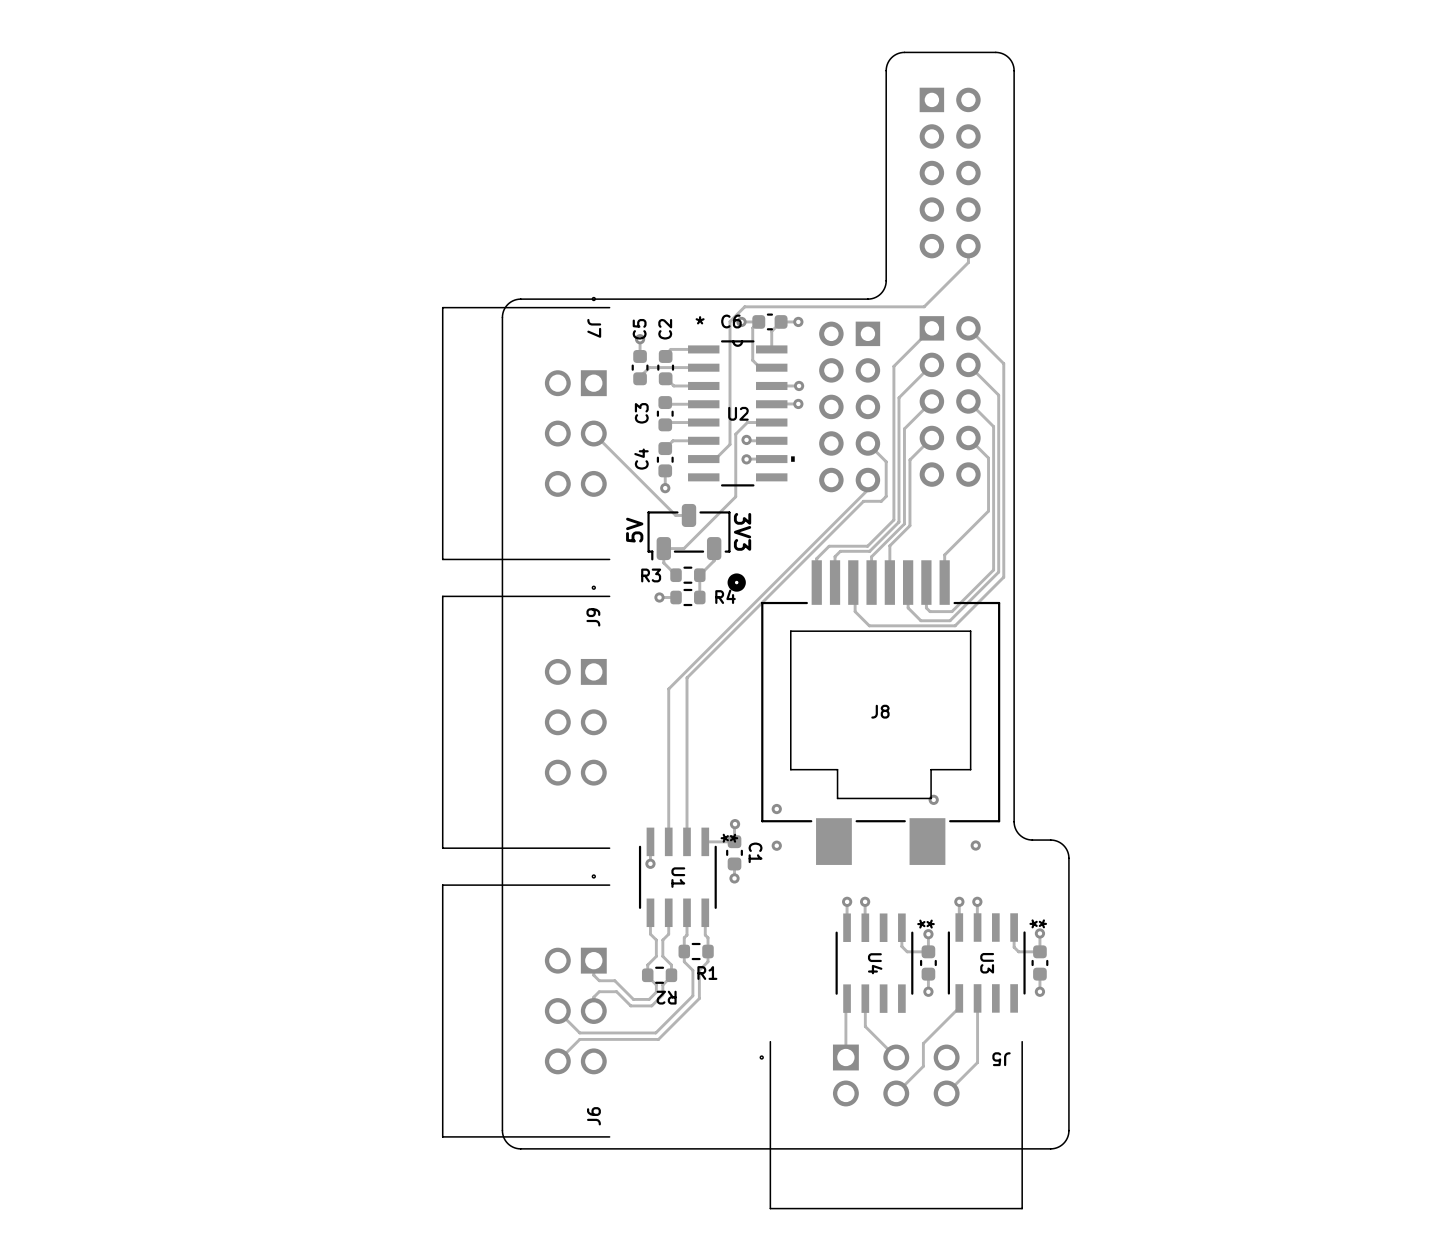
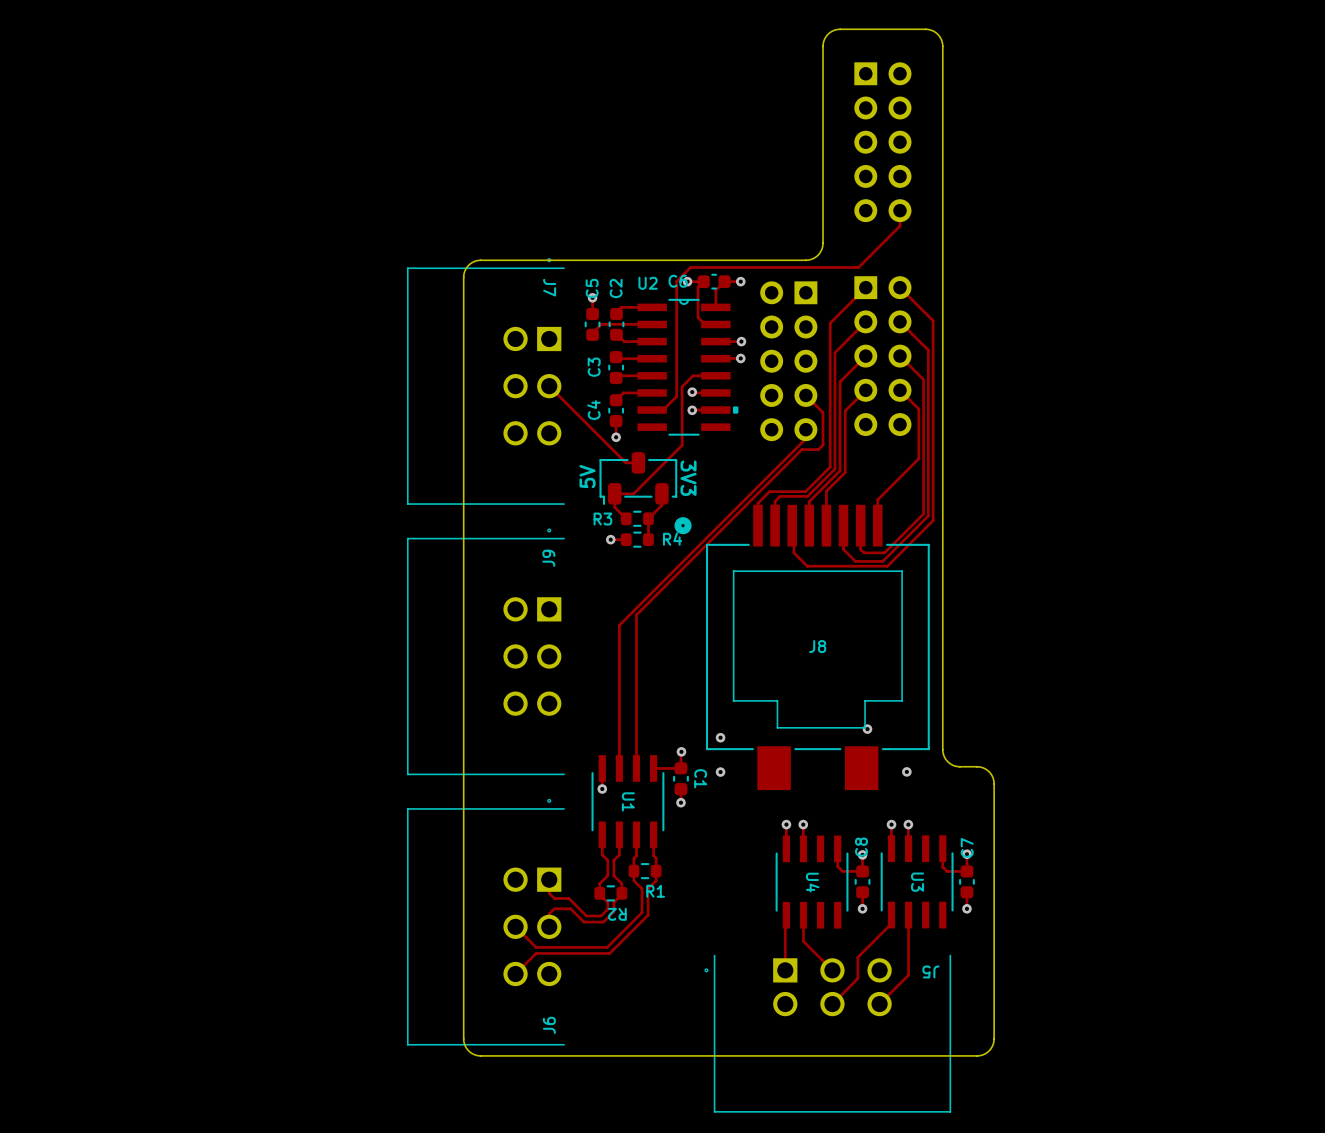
U2 footprint: [688, 340, 795, 487] -> [637, 298, 739, 436]
U2 name position: U2 (738, 413) -> U2 (648, 283)
U1 footprint: [638, 827, 717, 928] -> [591, 755, 665, 849]
U4 footprint: [835, 913, 914, 1013] -> [775, 835, 849, 929]
U3 footprint: [947, 913, 1026, 1013] -> [880, 835, 954, 929]
C8 name: none -> C8 (861, 847)
C7 name: none -> C7 (967, 847)

